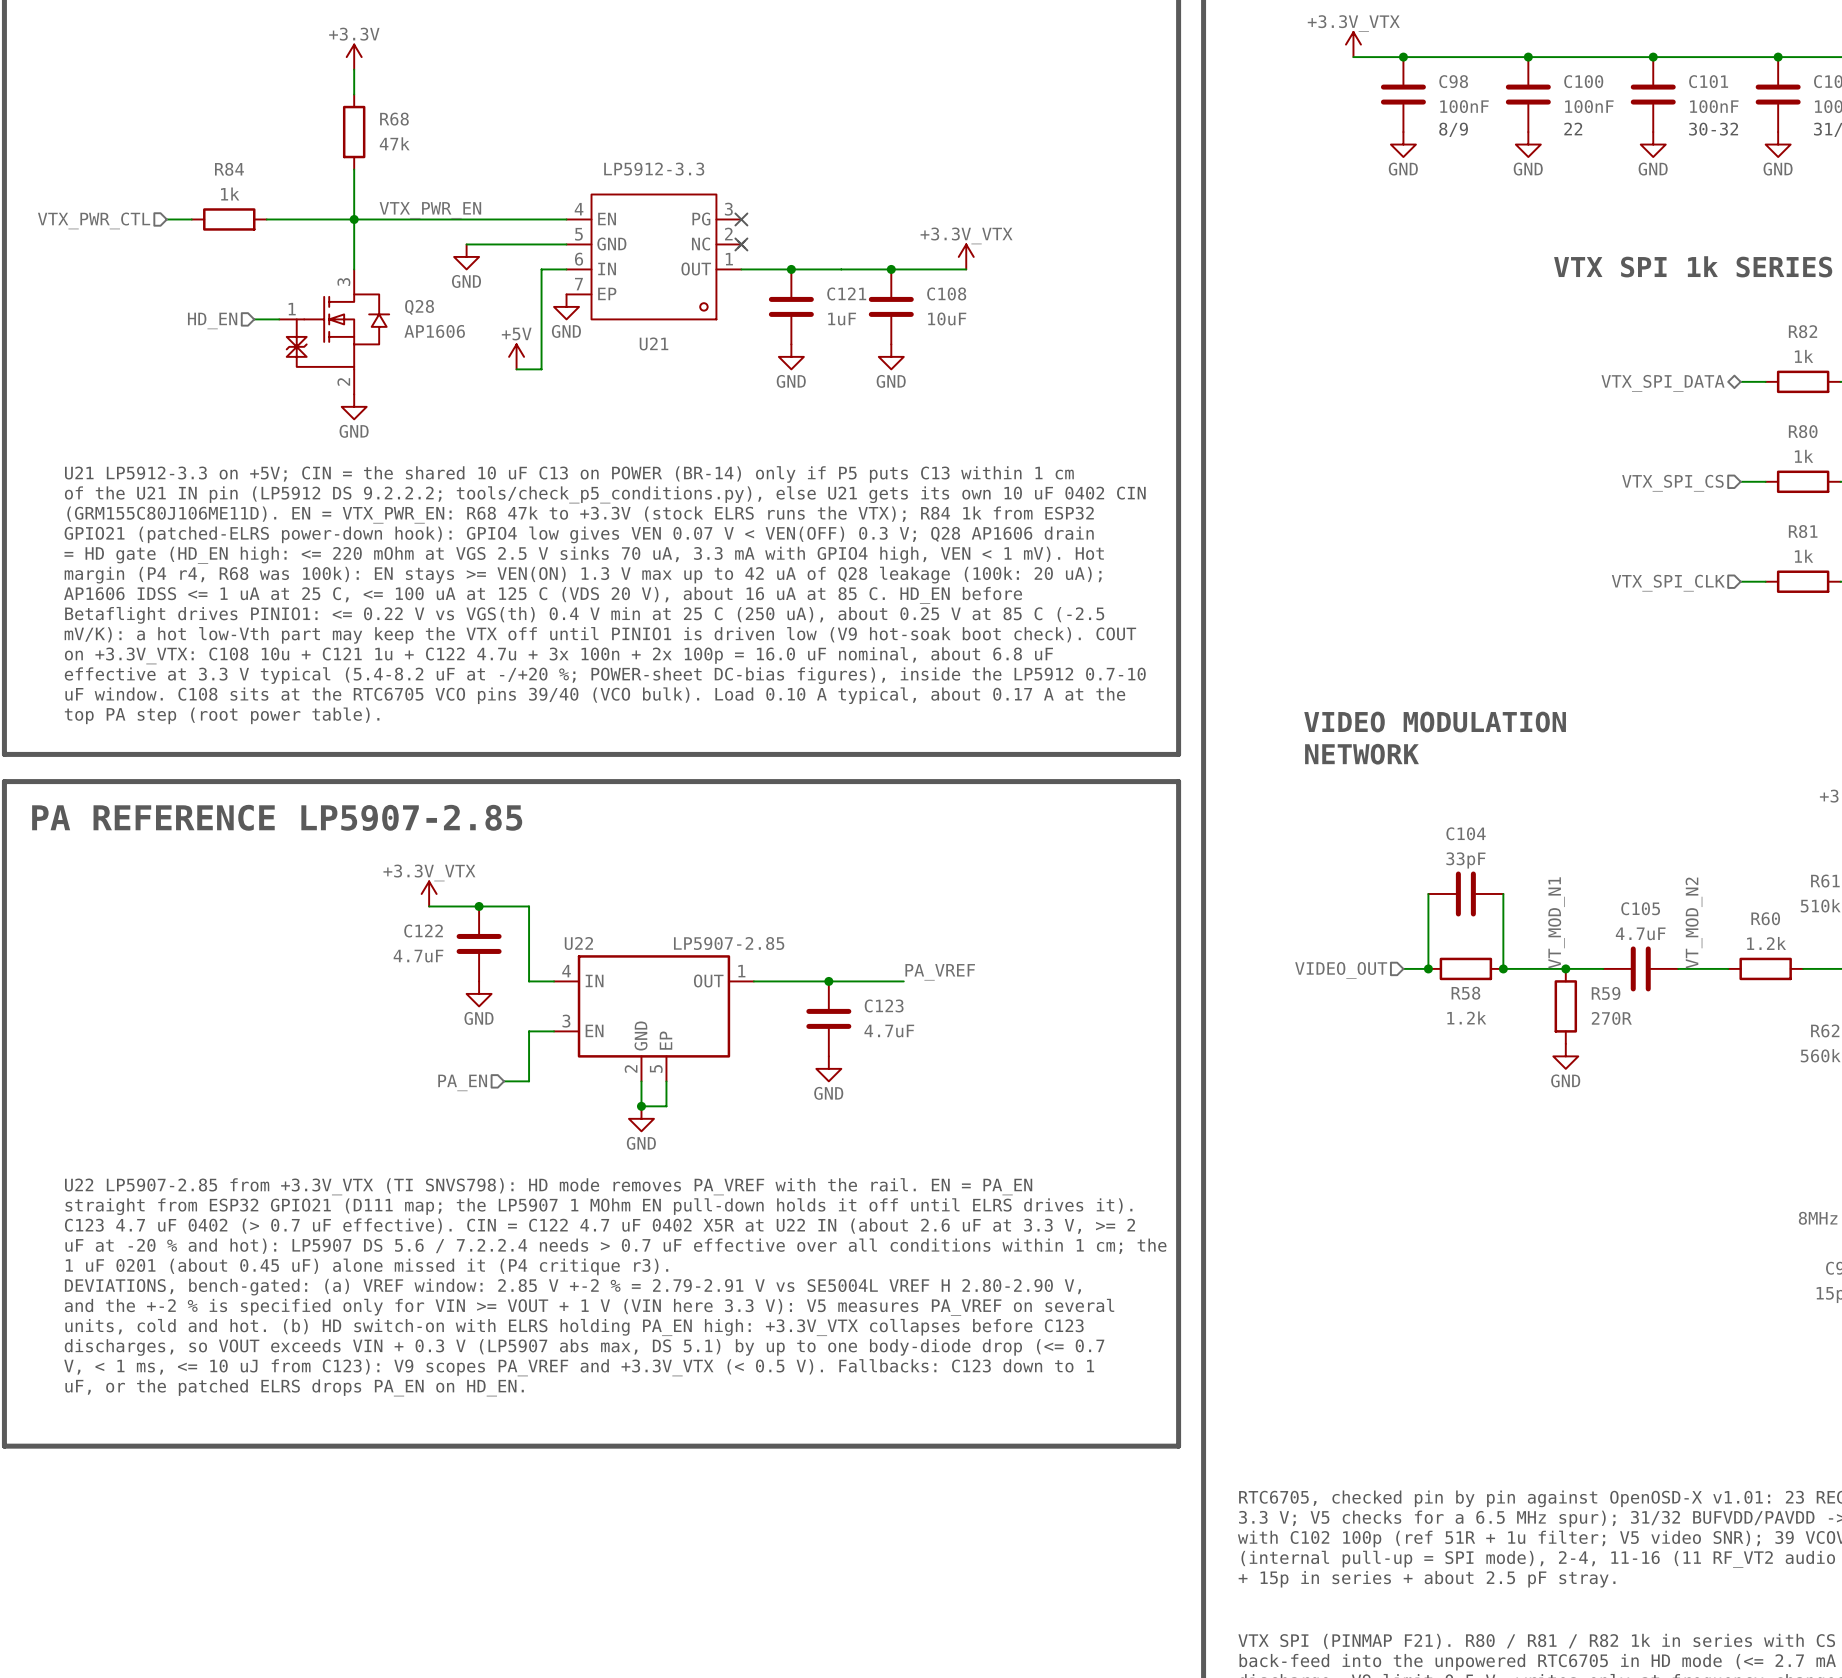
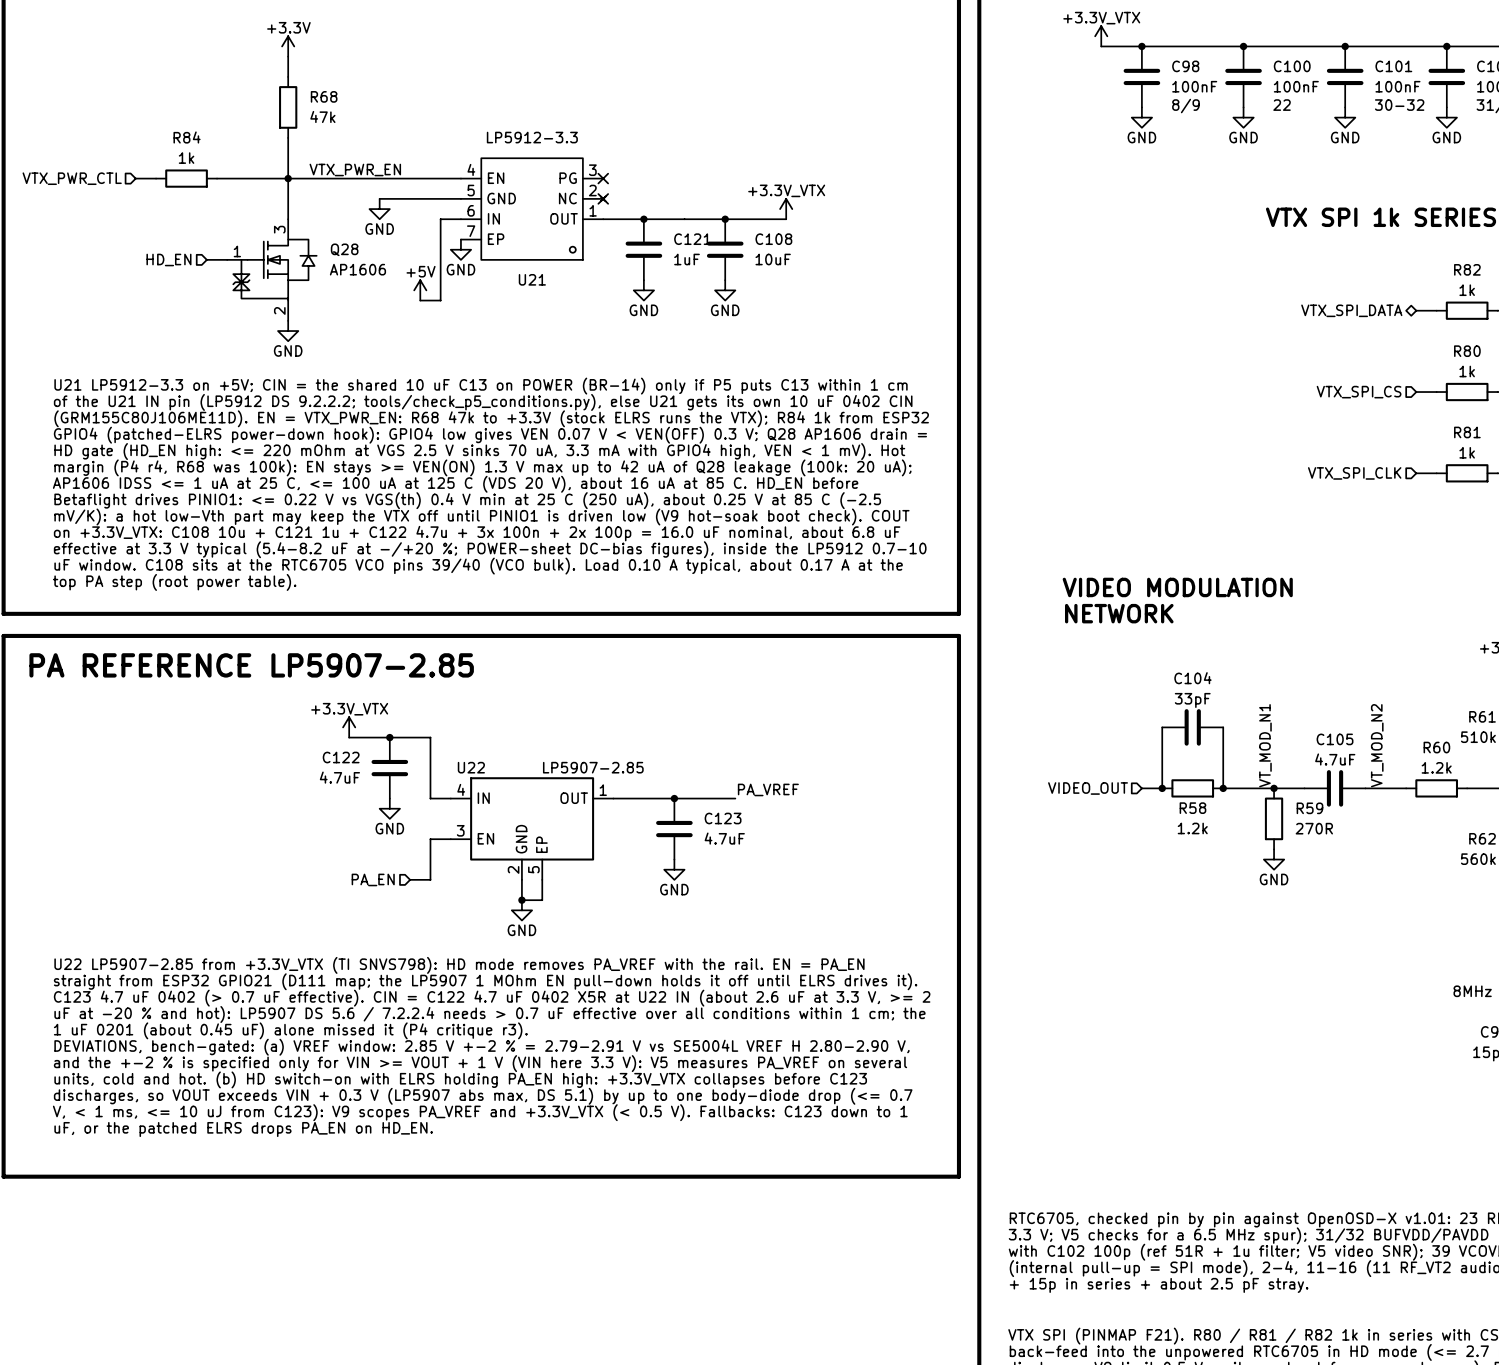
text: GPIO21 (patched-ELRS power-down hook): GPIO4 low gives VEN 0.07 V < VEN(OFF) 0.3 V; Q28 AP1606 drain (579, 534) -> GPIO4 (patched-ELRS power-down hook): GPIO4 low gives VEN 0.07 V < VEN(OFF) 0.3 V; Q28 AP1606 drain = (490, 435)
text: = HD gate (HD_EN high: <= 220 mOhm at VGS 2.5 V sinks 70 uA, 3.3 mA with GPIO4 high, VEN < 1 mV). Hot (584, 555) -> HD gate (HD_EN high: <= 220 mOhm at VGS 2.5 V sinks 70 uA, 3.3 mA with GPIO4 high, VEN < 1 mV). Hot (479, 451)

